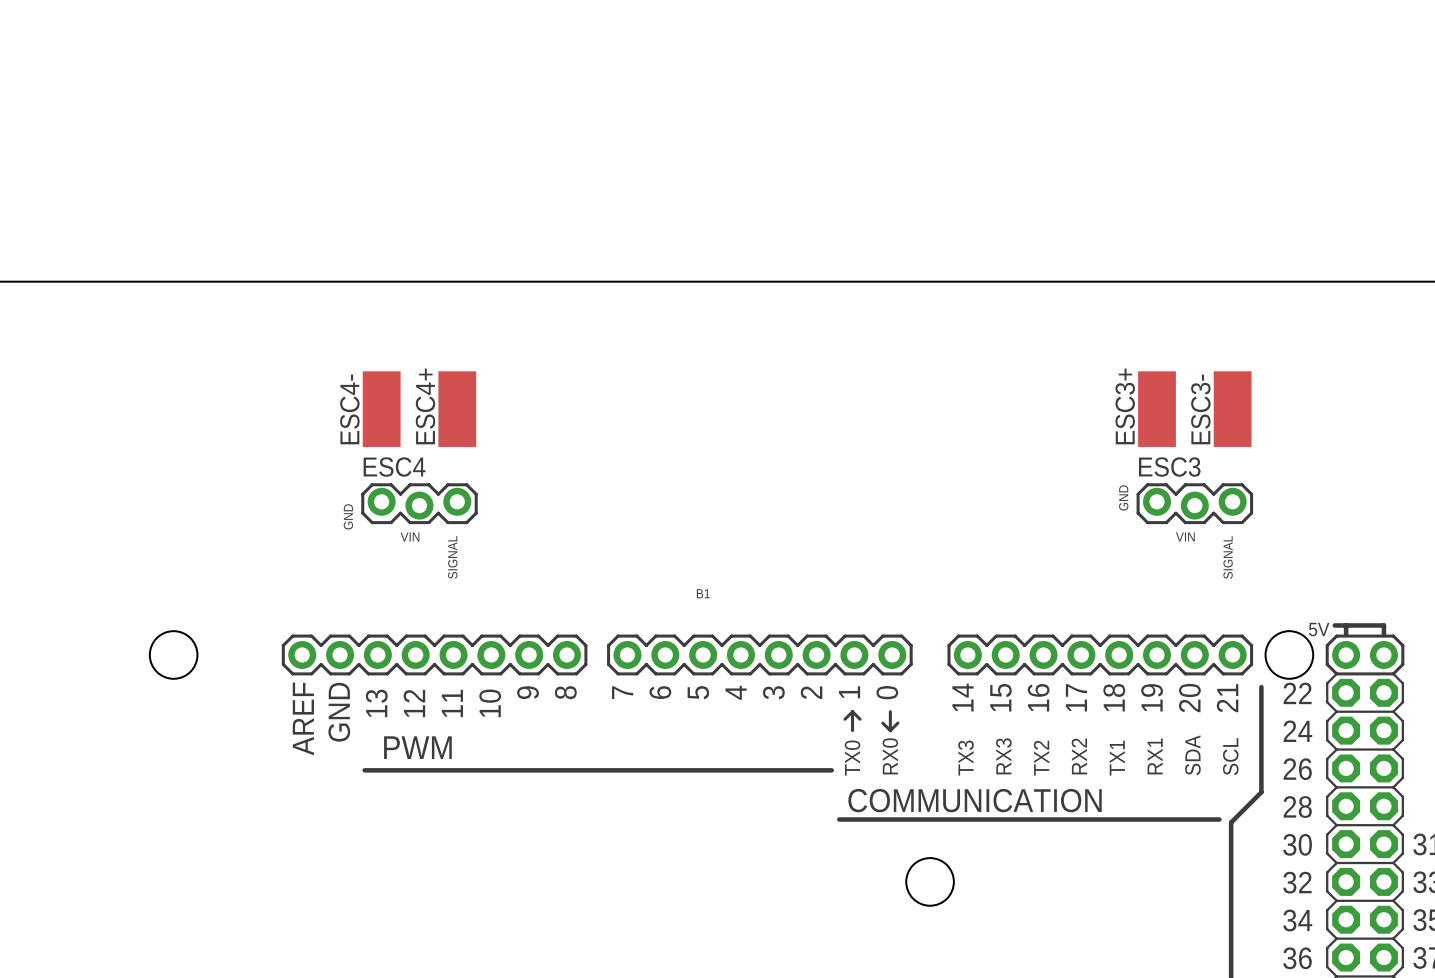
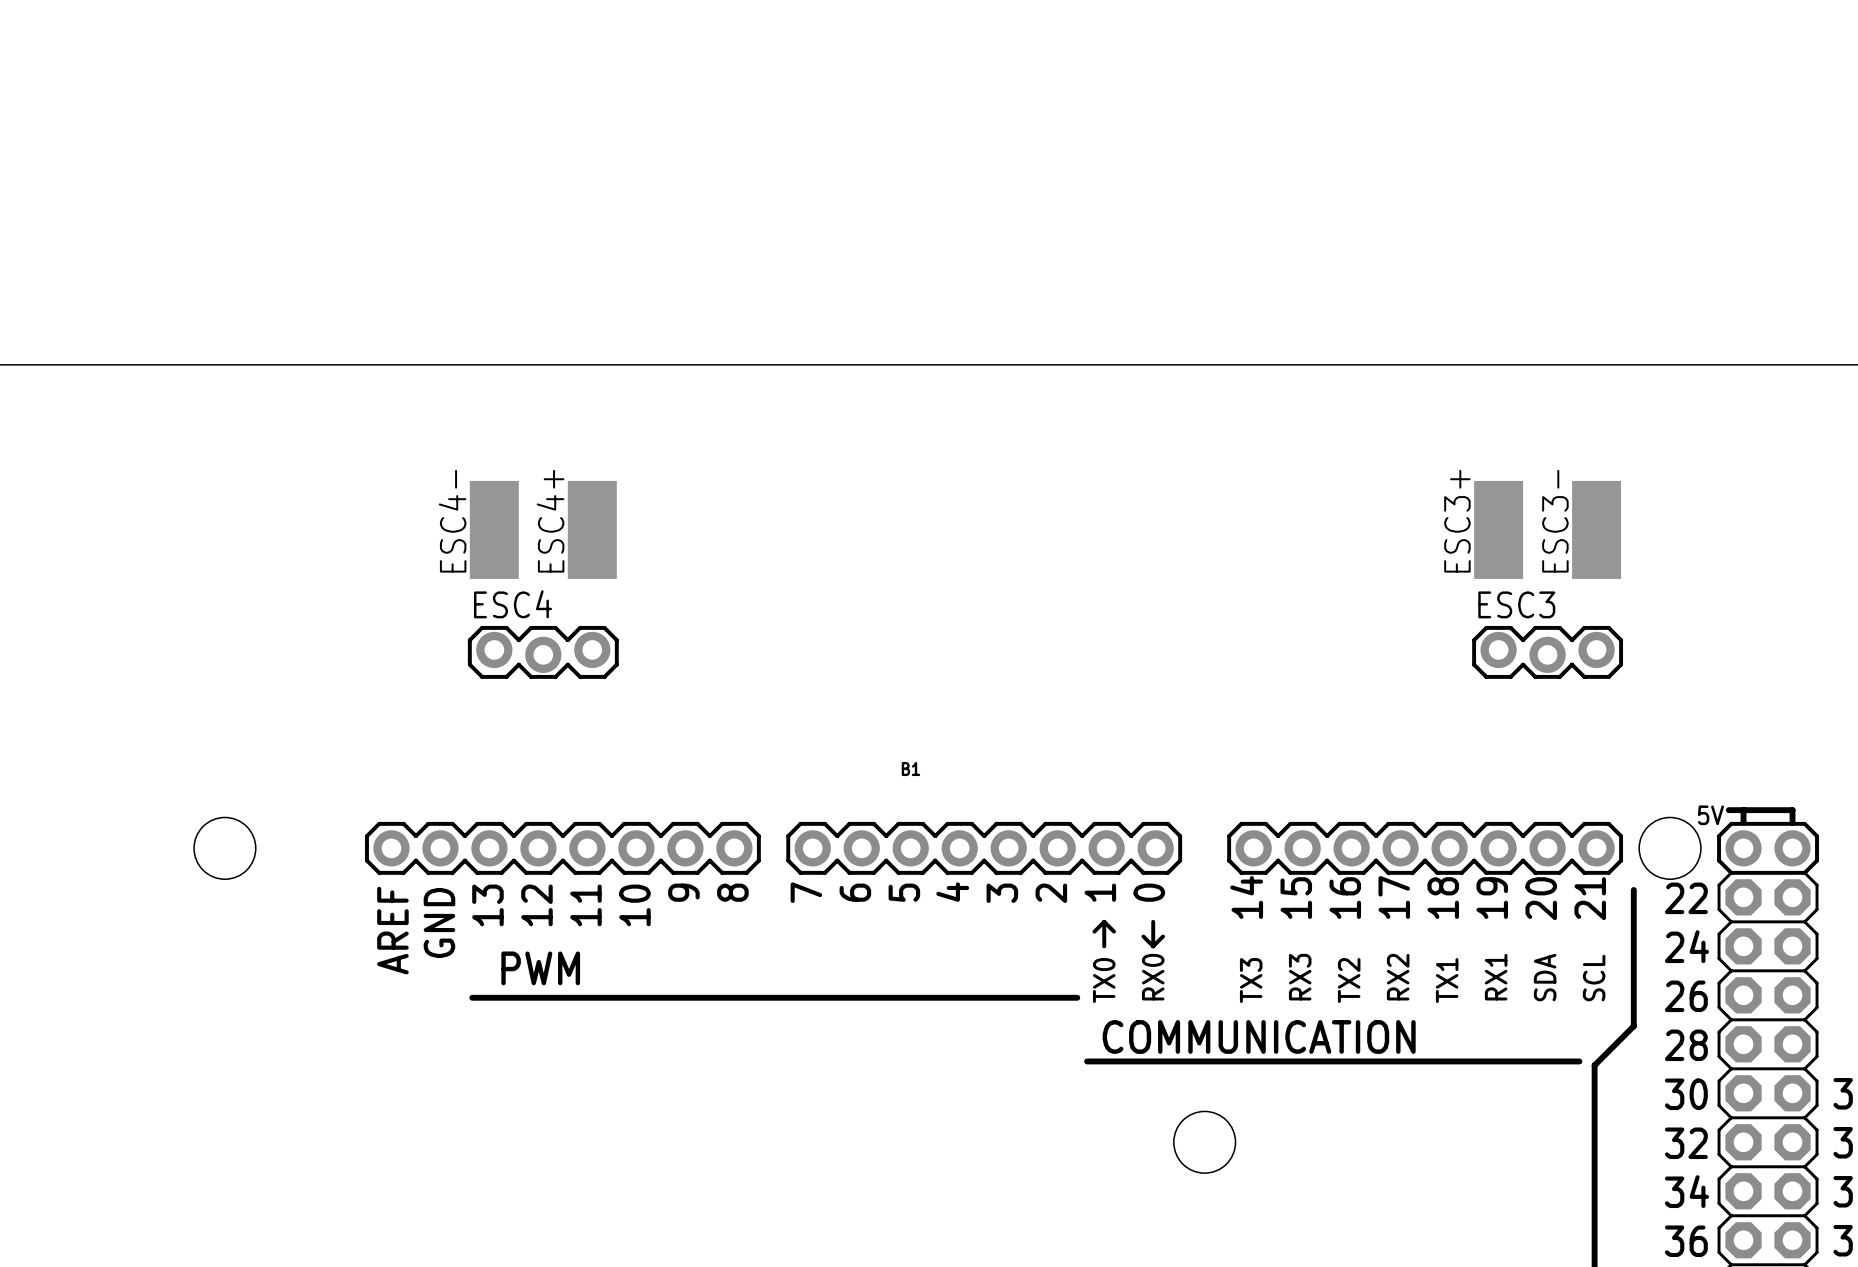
text: GND (1123, 497) -> none
text: GND (348, 516) -> none
text: VIN (410, 536) -> none
text: VIN (1185, 536) -> none
text: SIGNAL (452, 557) -> none
text: SIGNAL (1228, 557) -> none

